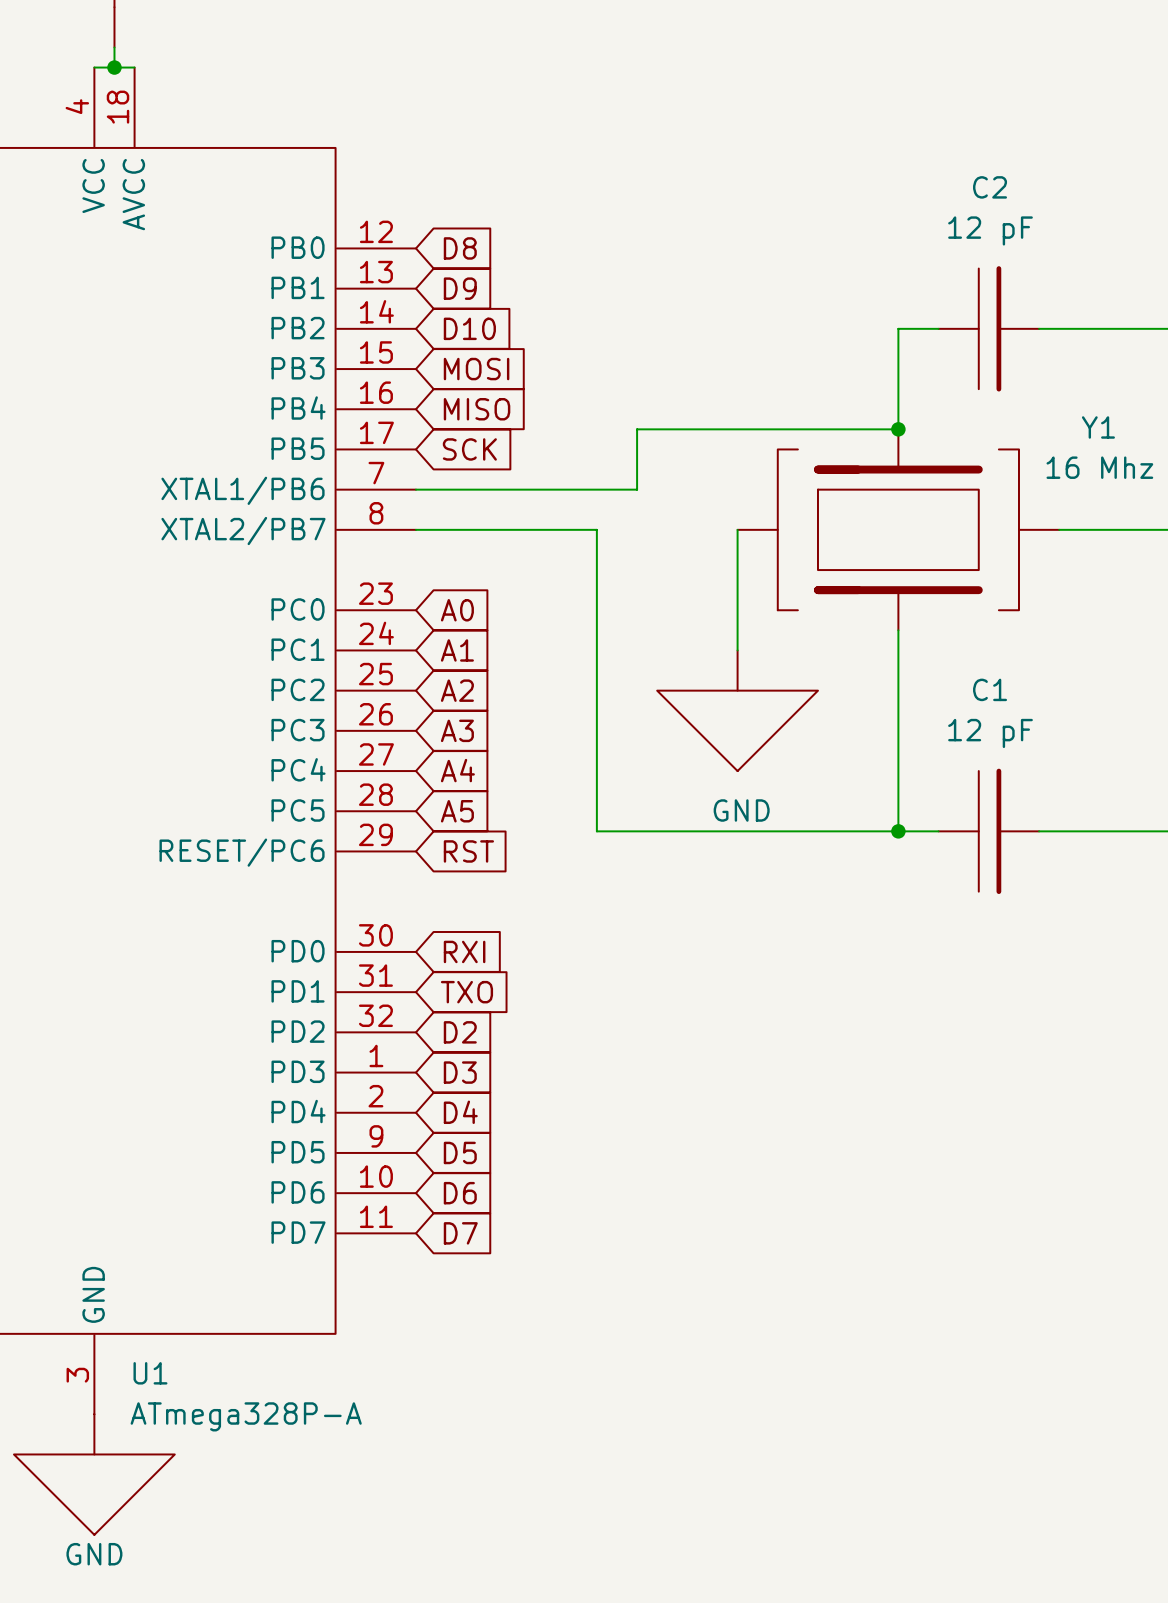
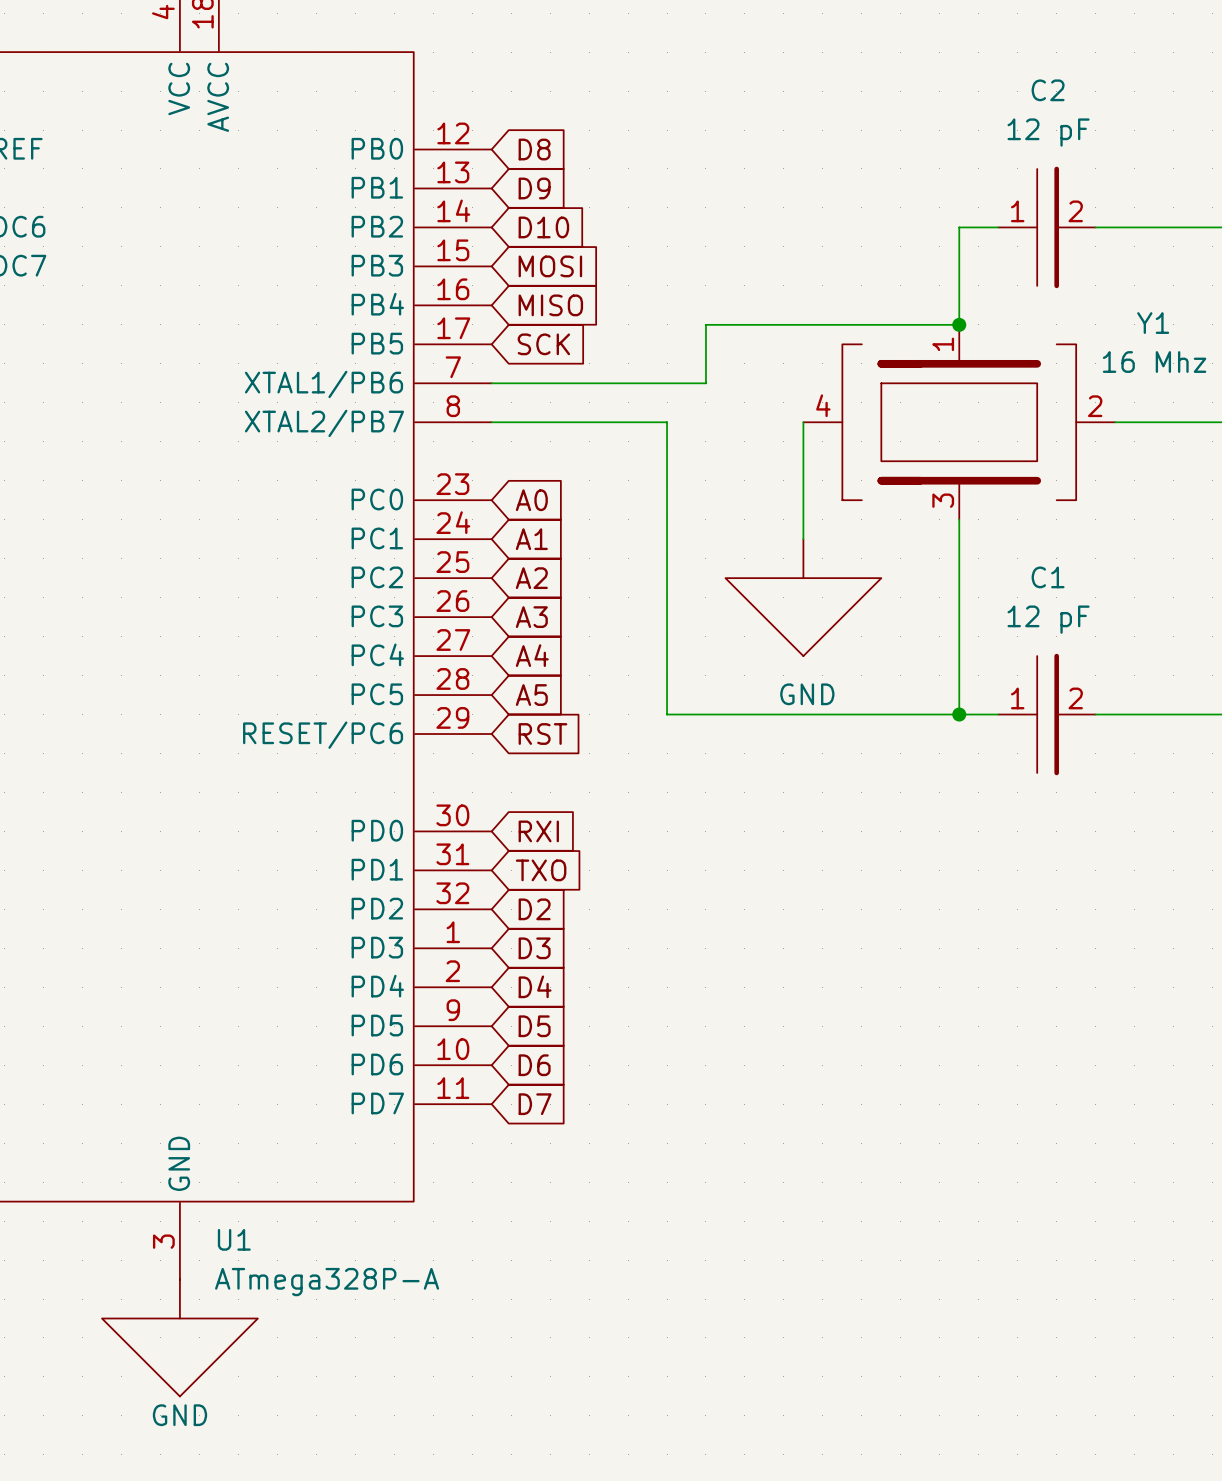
C2 pin number: none -> 1 (1017, 211)
C2 pin number: none -> 2 (1075, 211)
Y1 pin number: none -> 1 (943, 344)
Y1 pin number: none -> 4 (823, 405)
Y1 pin number: none -> 2 (1095, 406)
Y1 pin number: none -> 3 (943, 500)
C1 pin number: none -> 1 (1017, 698)
C1 pin number: none -> 2 (1075, 698)

